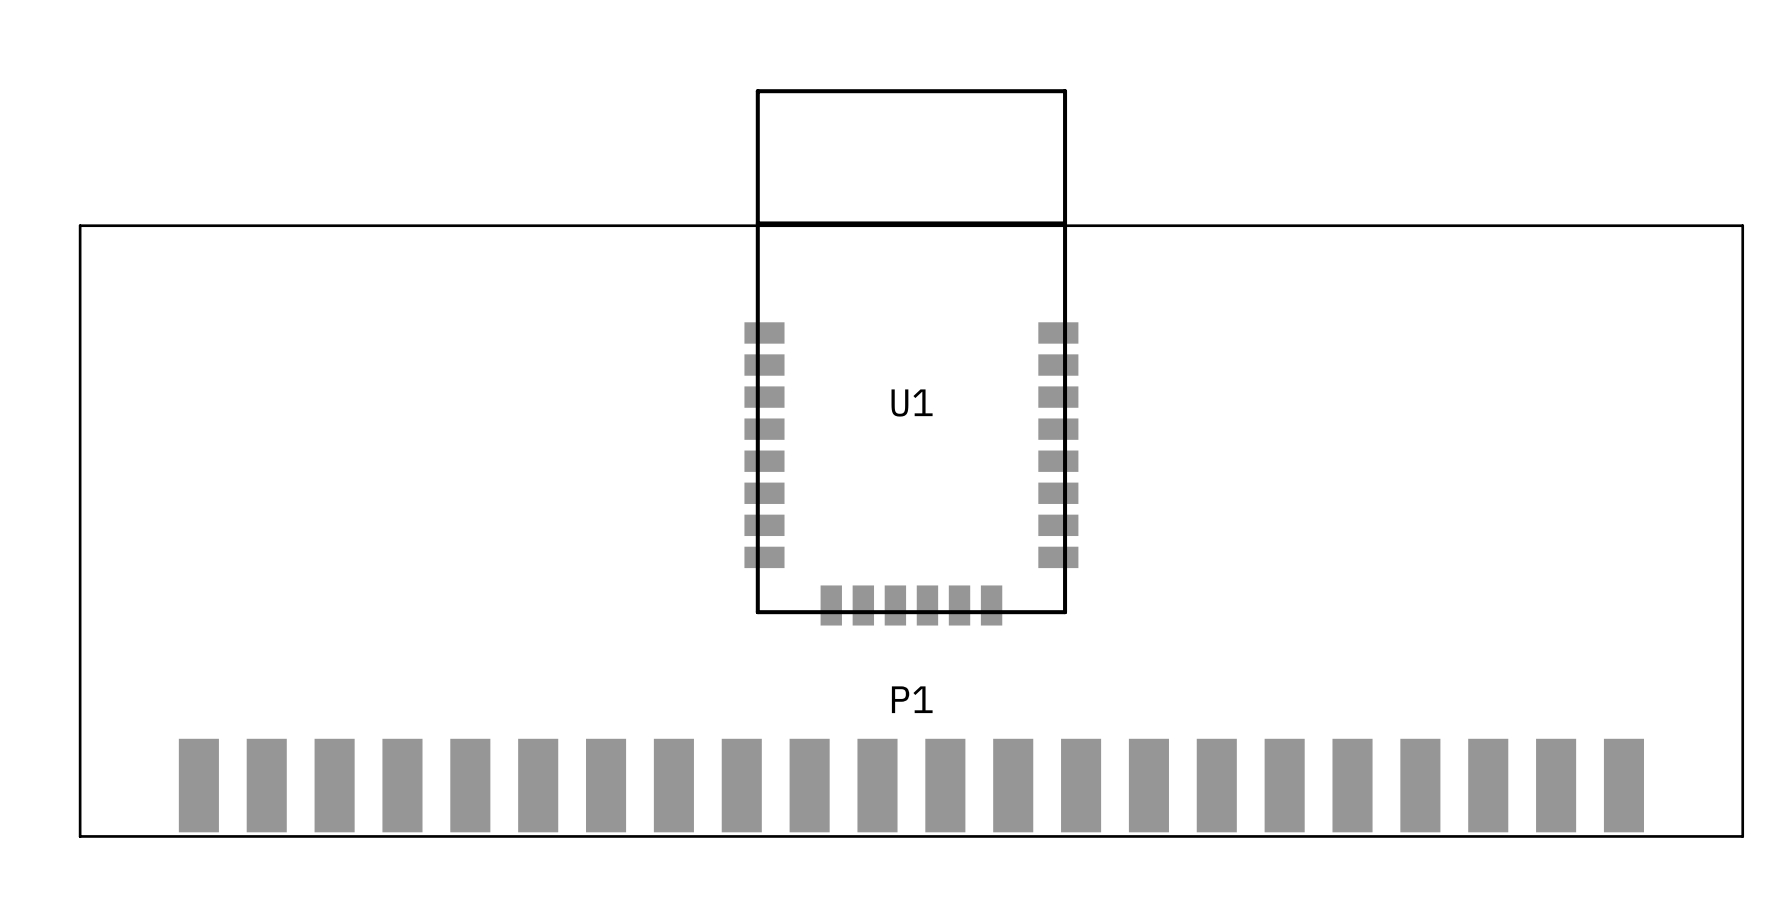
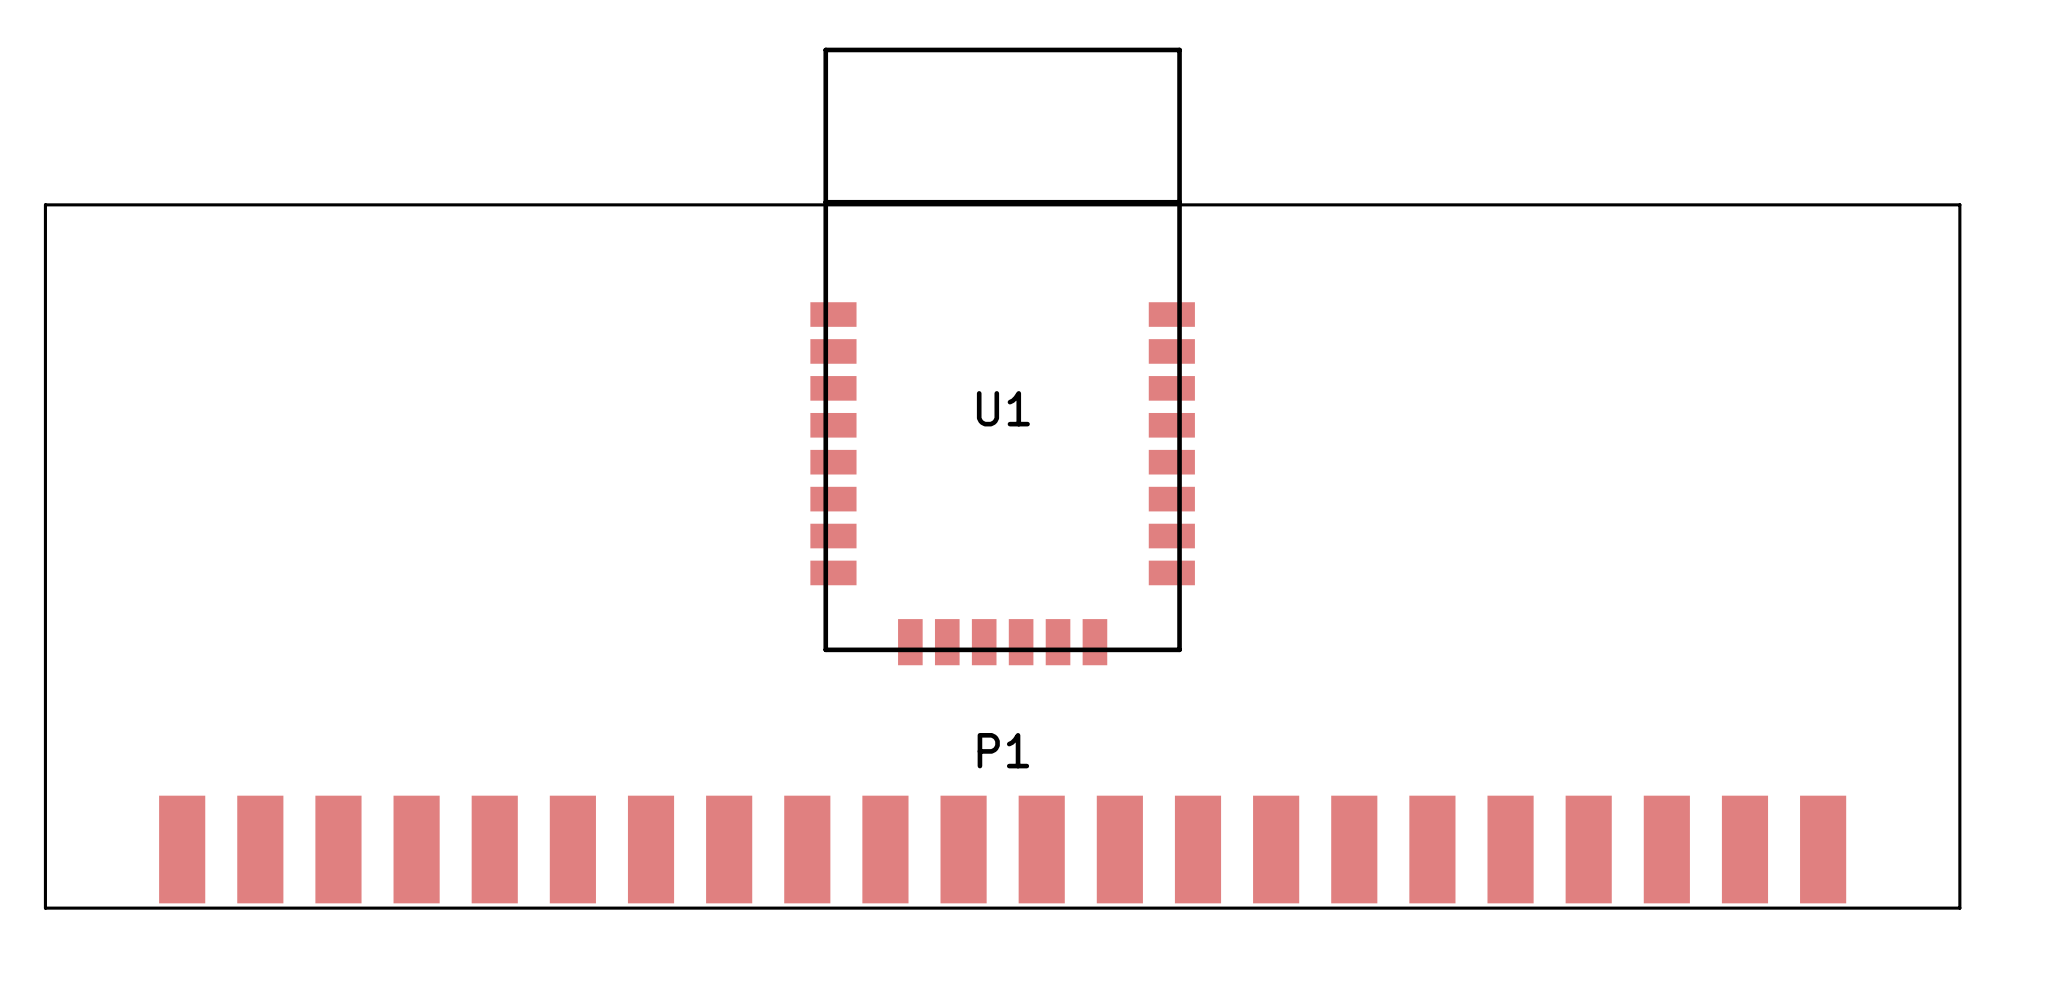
U1 footprint: [744, 89, 1079, 626] -> [810, 47, 1195, 666]

